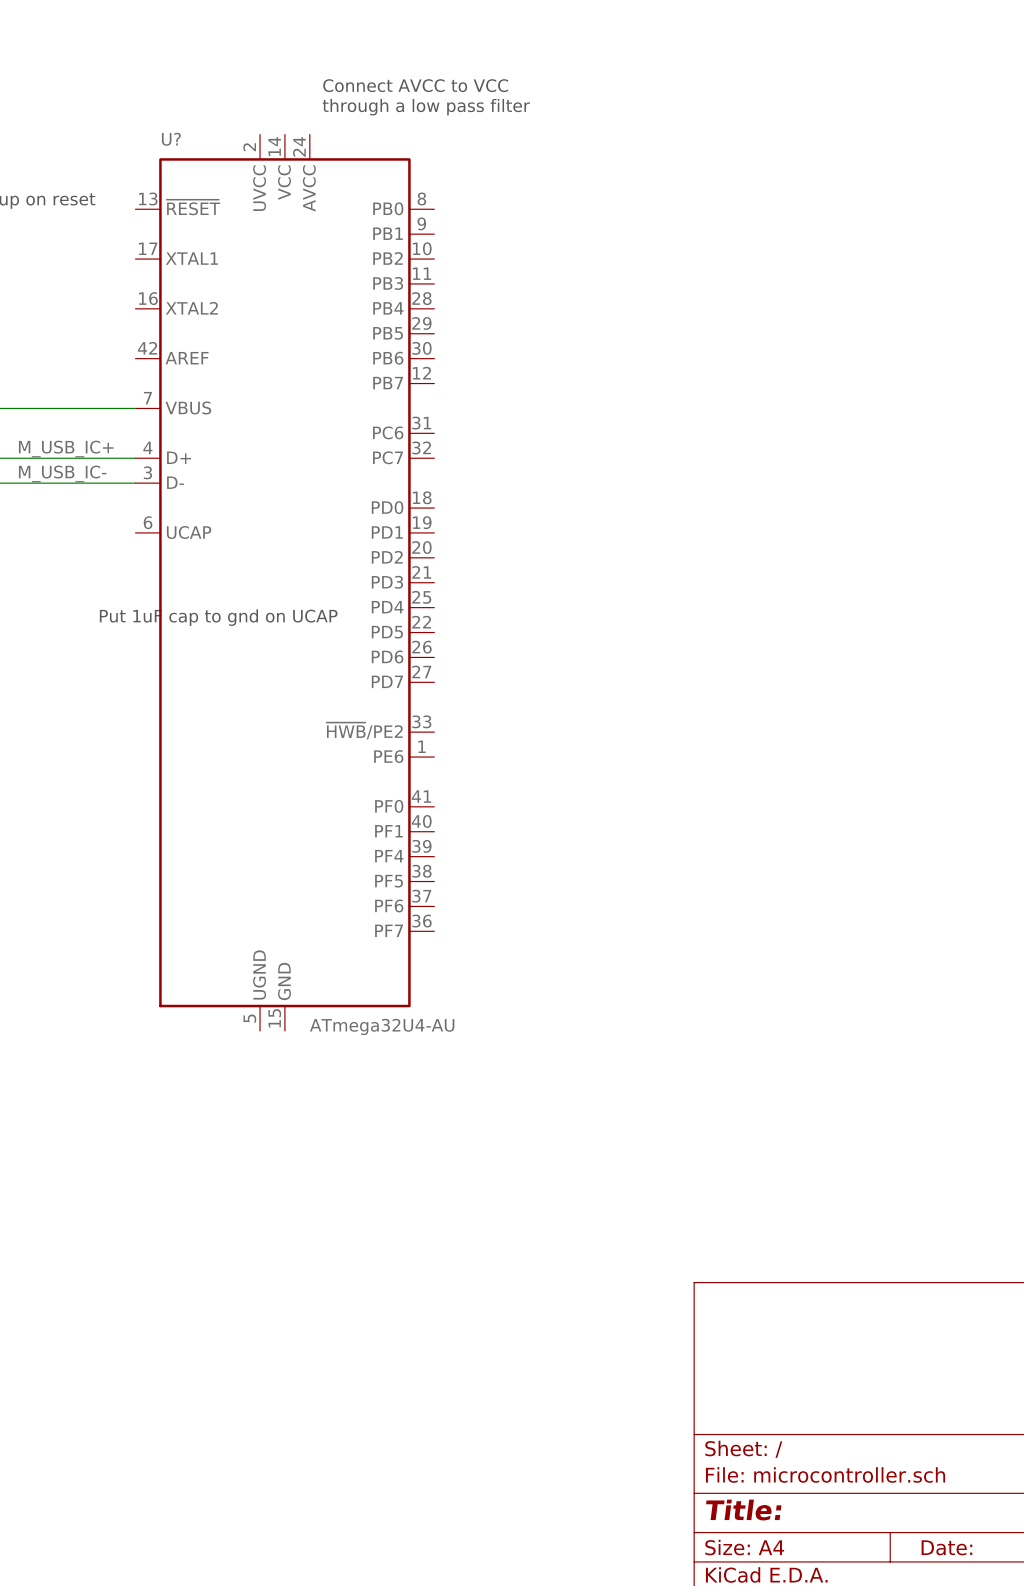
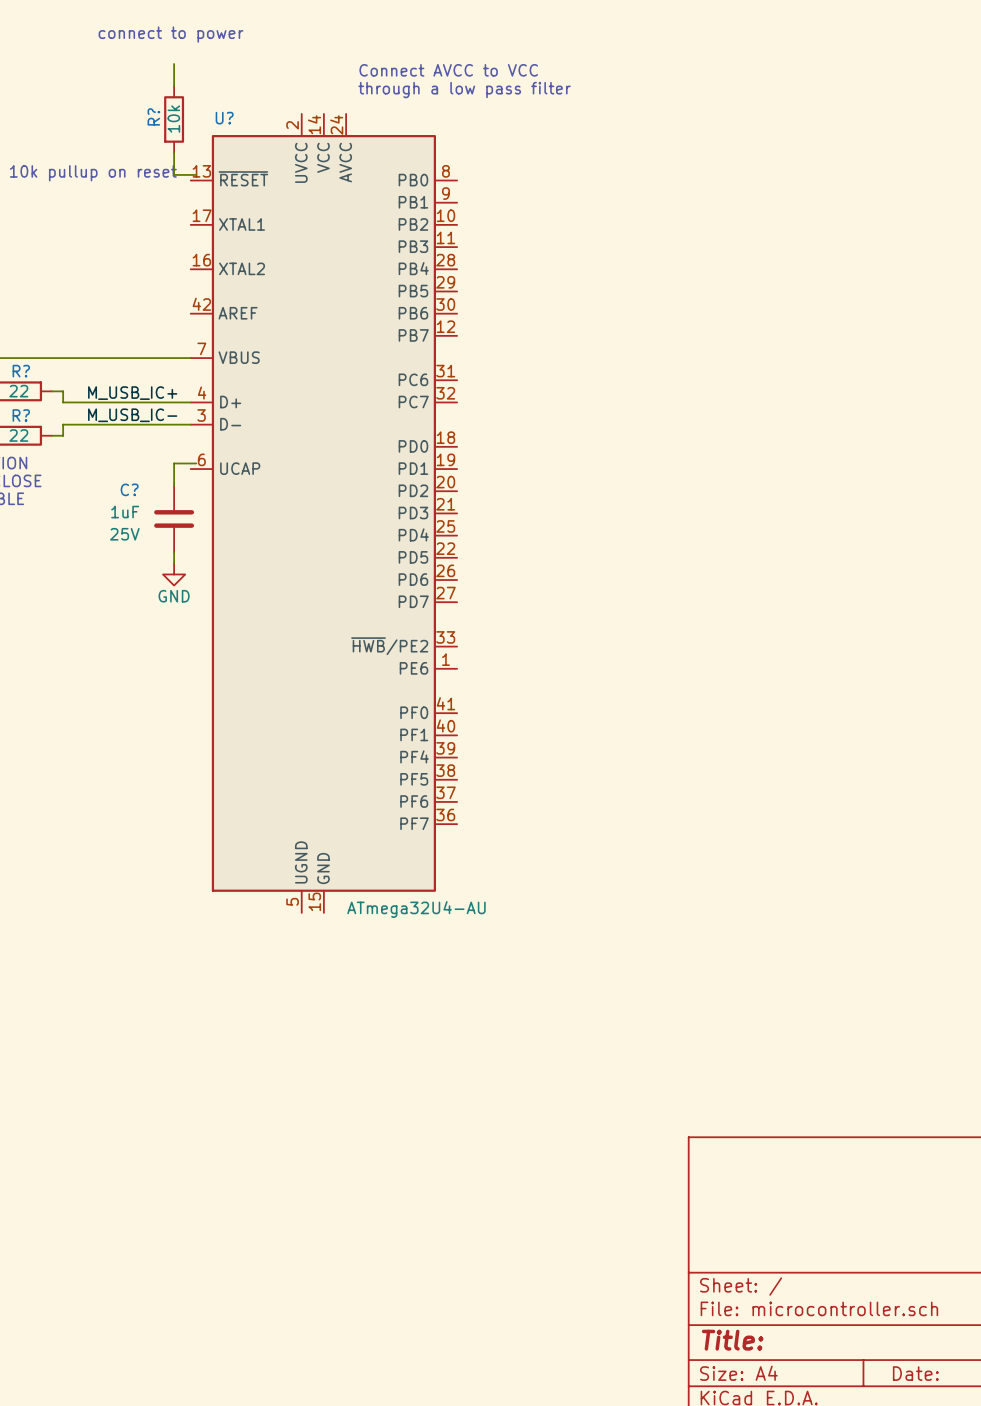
text: none -> connect to power (171, 34)
wire: none -> (174, 63) (174, 86)
R?: none -> (174, 119)
wire: none -> (174, 152) (174, 174) (196, 174)
wire: none -> (196, 463) (174, 463) (174, 485)
C?: none -> (174, 518)
text: Put 1uF cap to gnd on UCAP (218, 617) -> none
wire: none -> (174, 552) (174, 563)
power symbol: none -> GND (174, 574)

